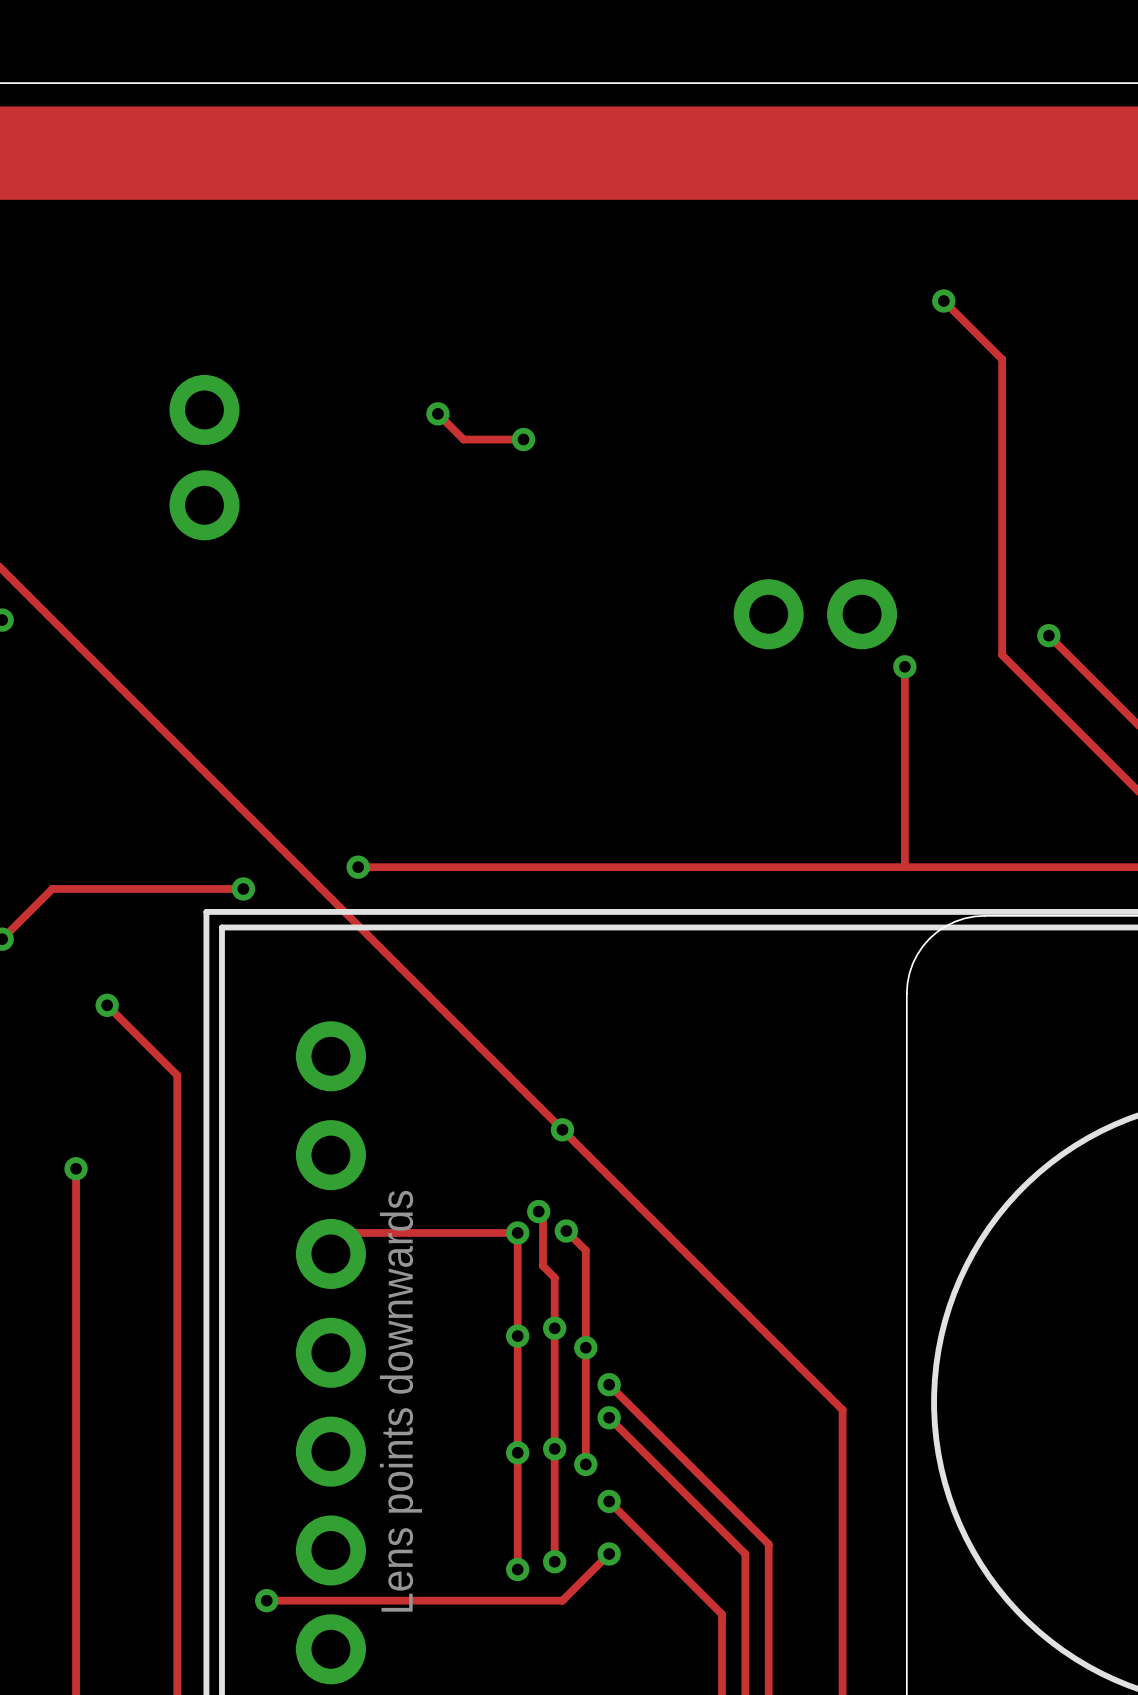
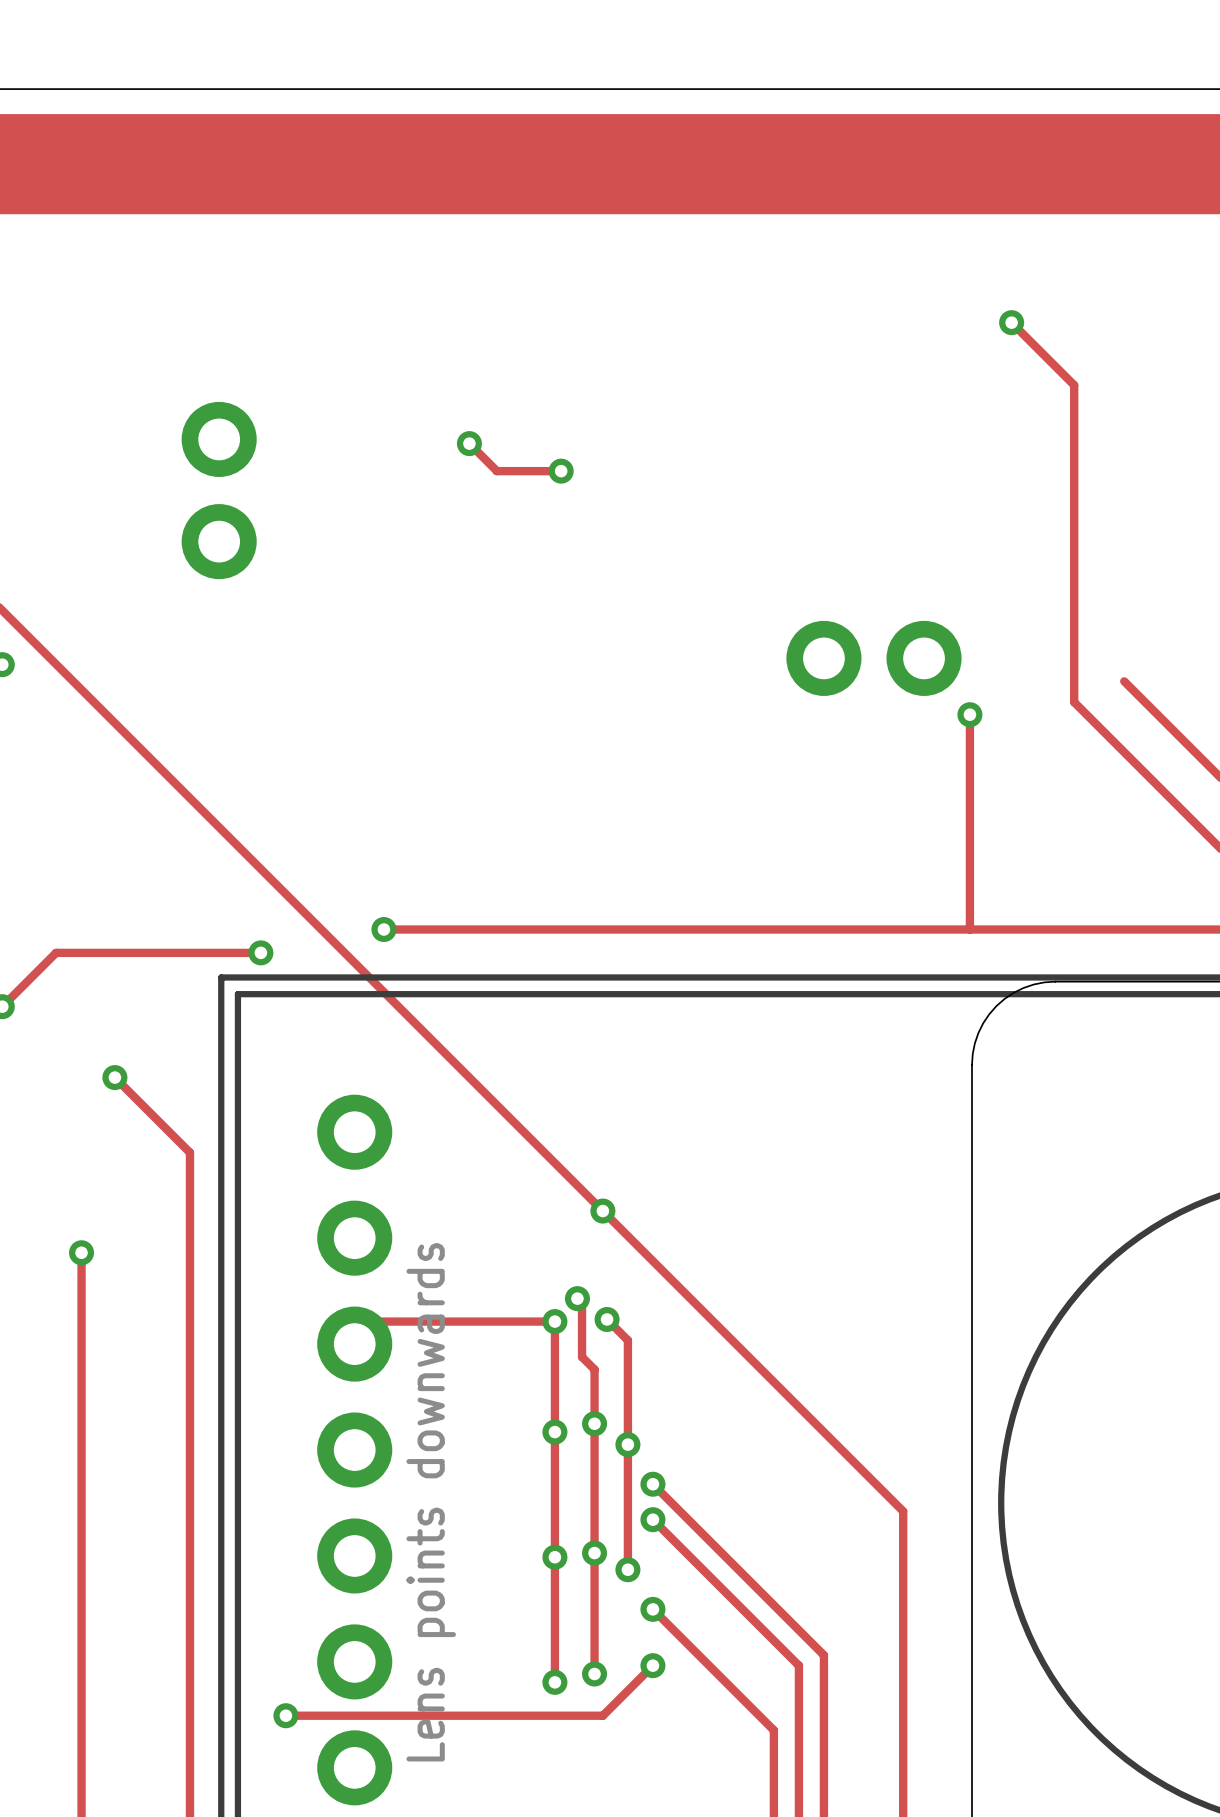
via: (1048, 635) -> none

